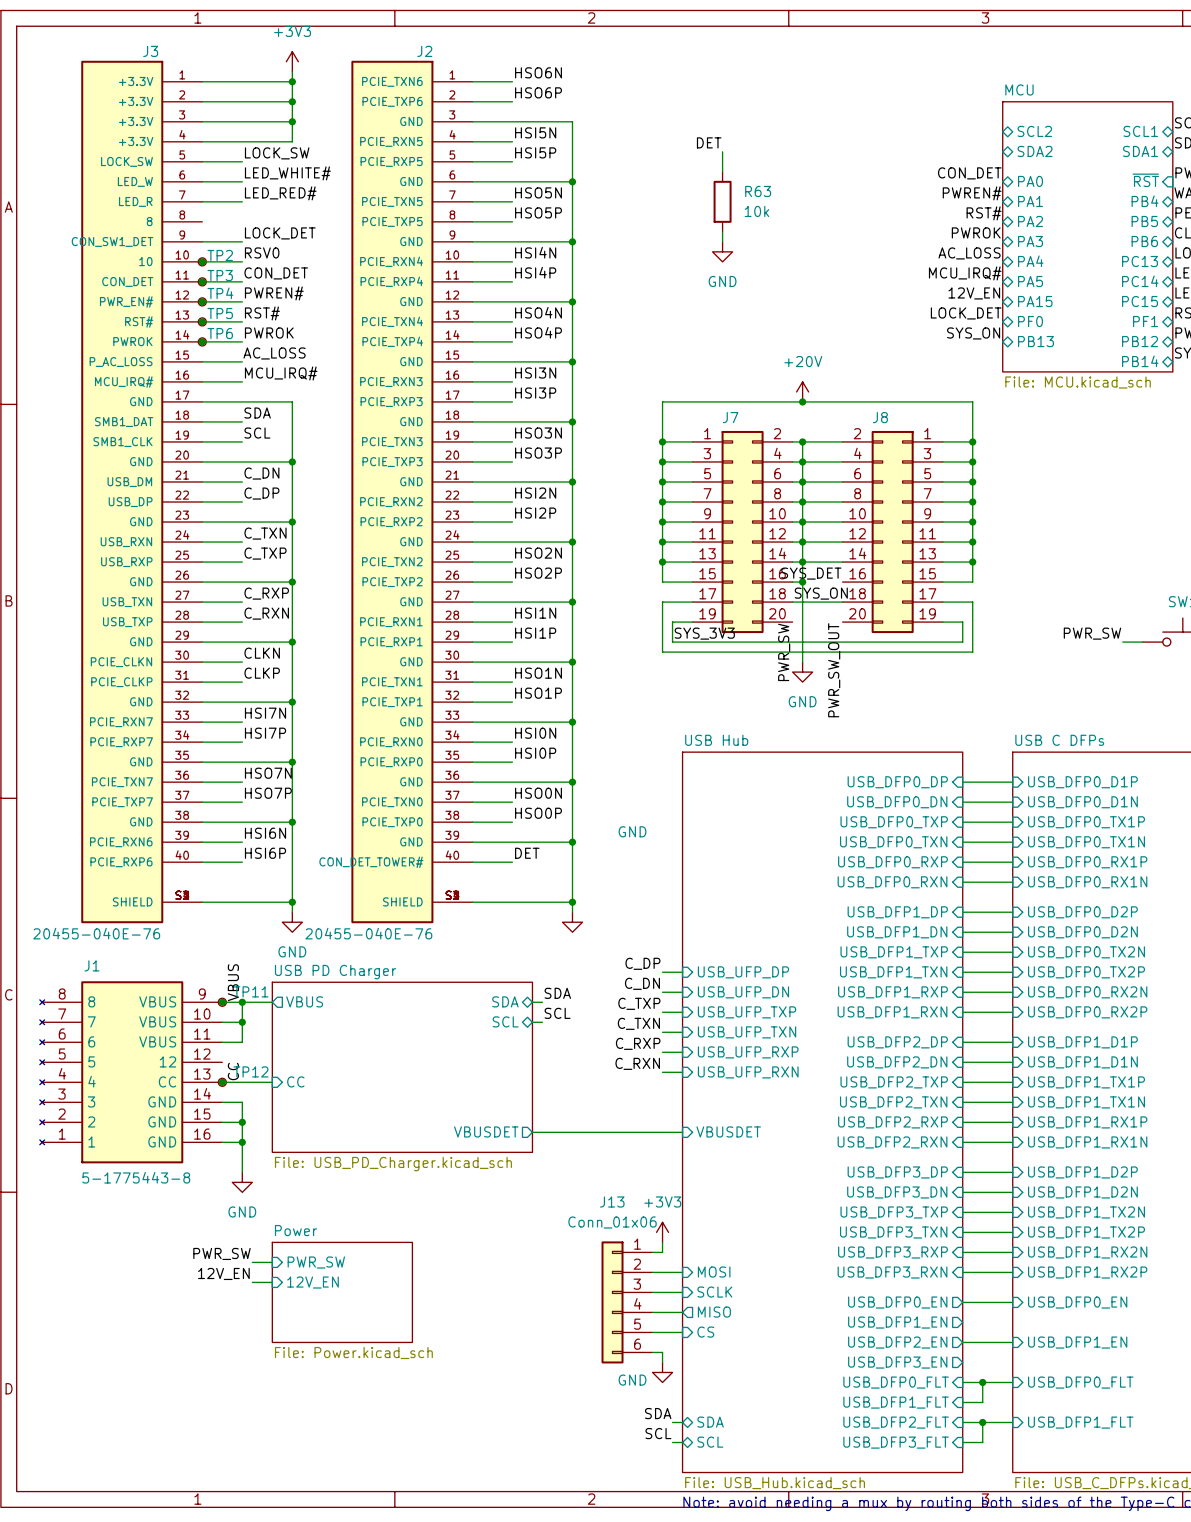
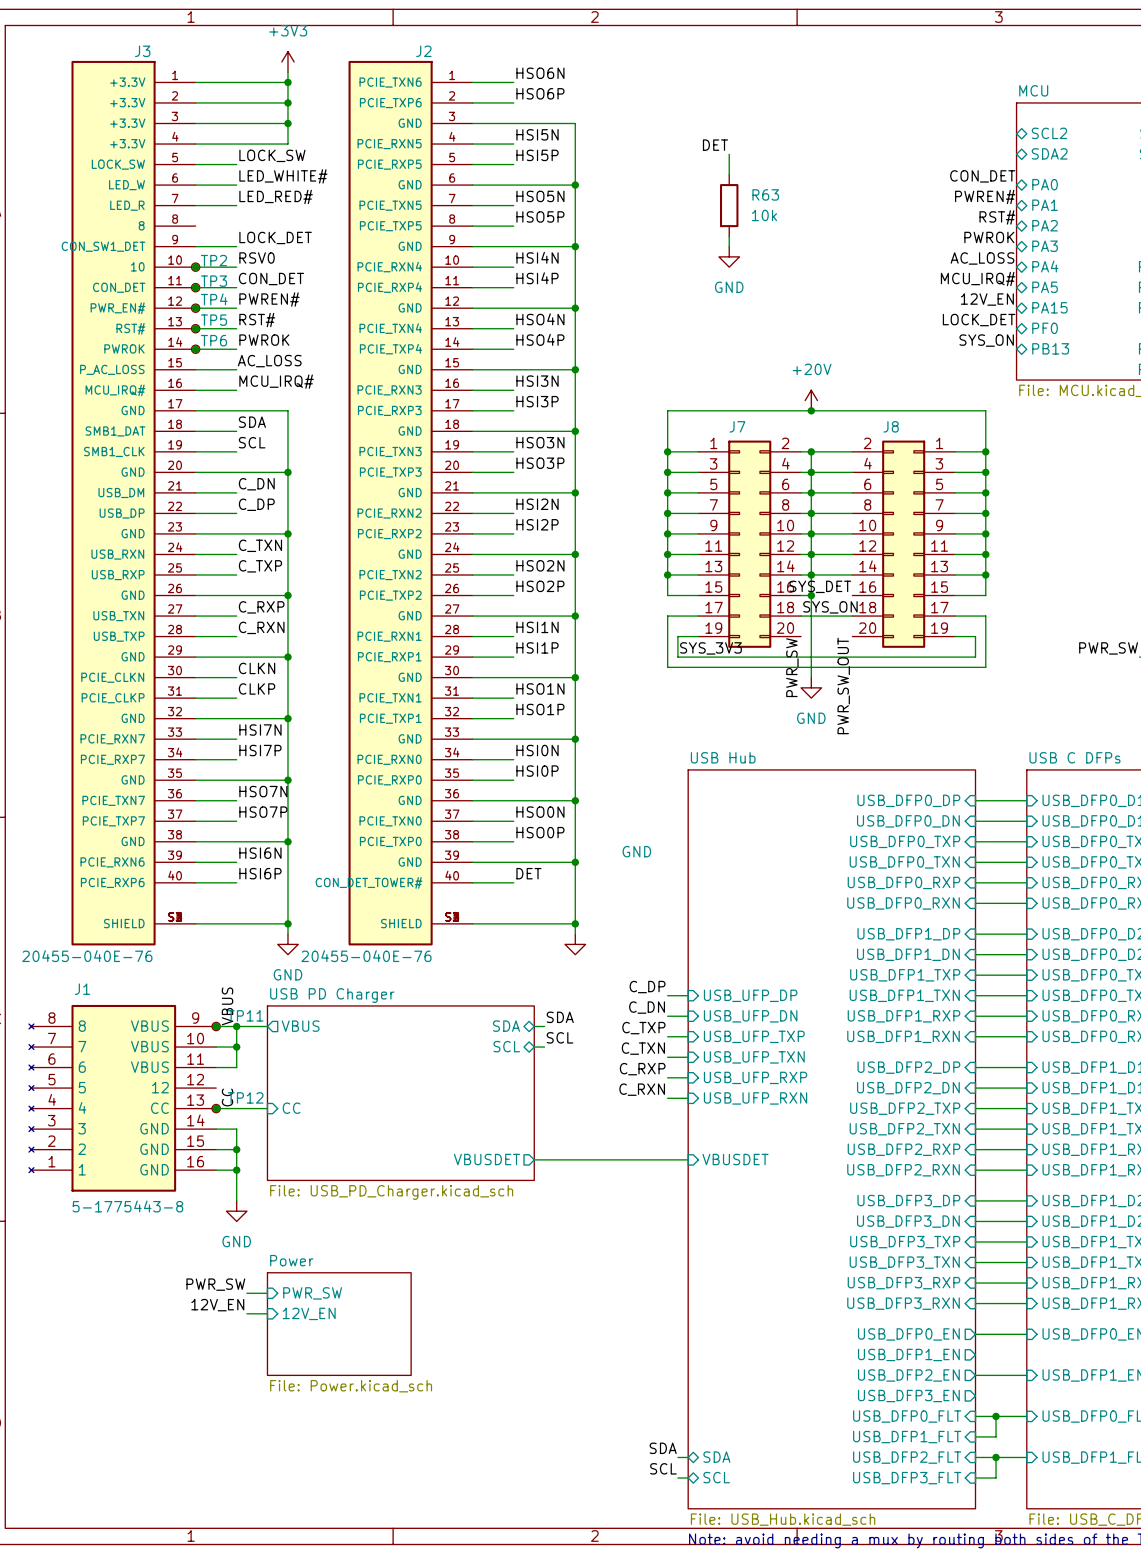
power symbol: +3V3 (662, 1232) -> none
wire: (662, 1242) (662, 1252) (652, 1252) -> none
wire: (652, 1272) (682, 1272) -> none
sheet pin: MOSI (714, 1272) -> none
wire: (652, 1292) (682, 1292) -> none
sheet pin: SCLK (714, 1292) -> none
J13: Conn_01x06 (627, 1302) -> none
wire: (652, 1312) (682, 1312) -> none
sheet pin: MISO (714, 1312) -> none
wire: (652, 1332) (682, 1332) -> none
sheet pin: CS (705, 1332) -> none
wire: (652, 1352) (662, 1352) (662, 1362) -> none
power symbol: GND (662, 1372) -> none

